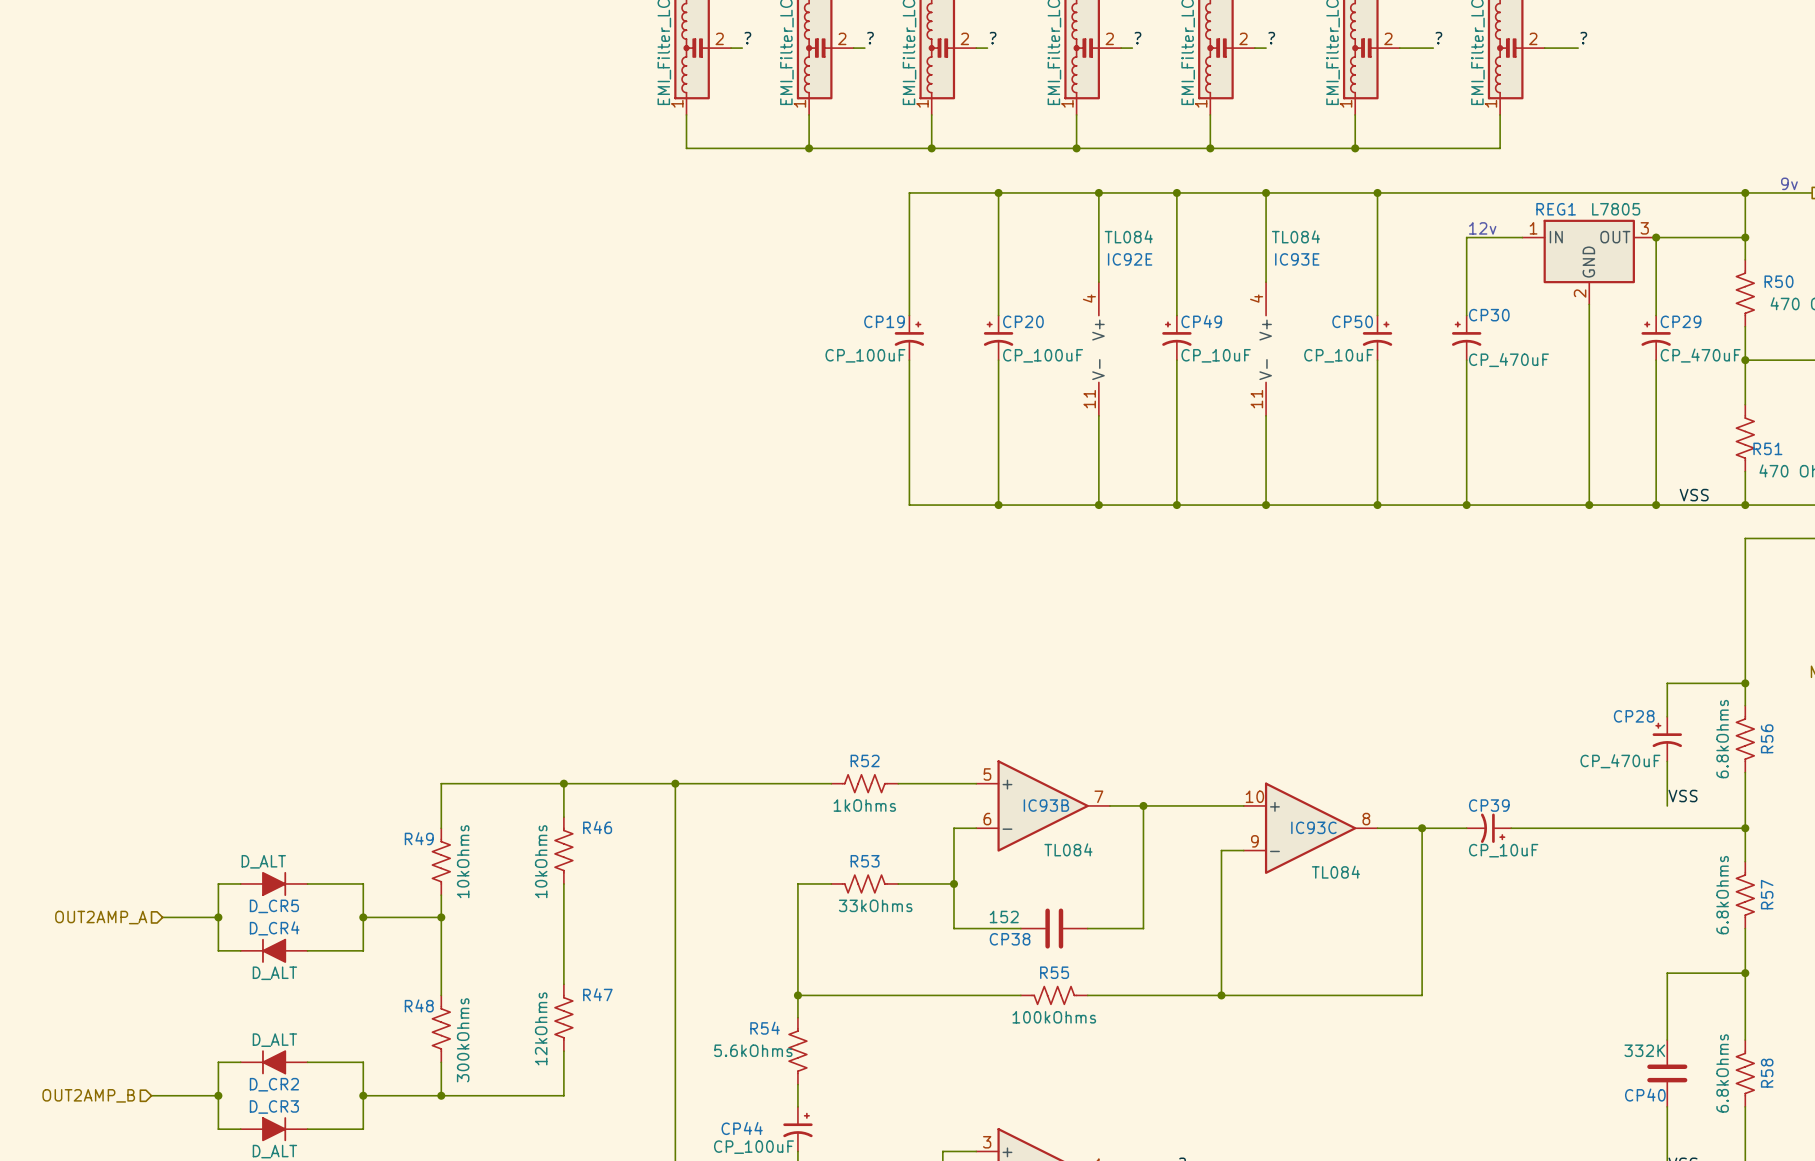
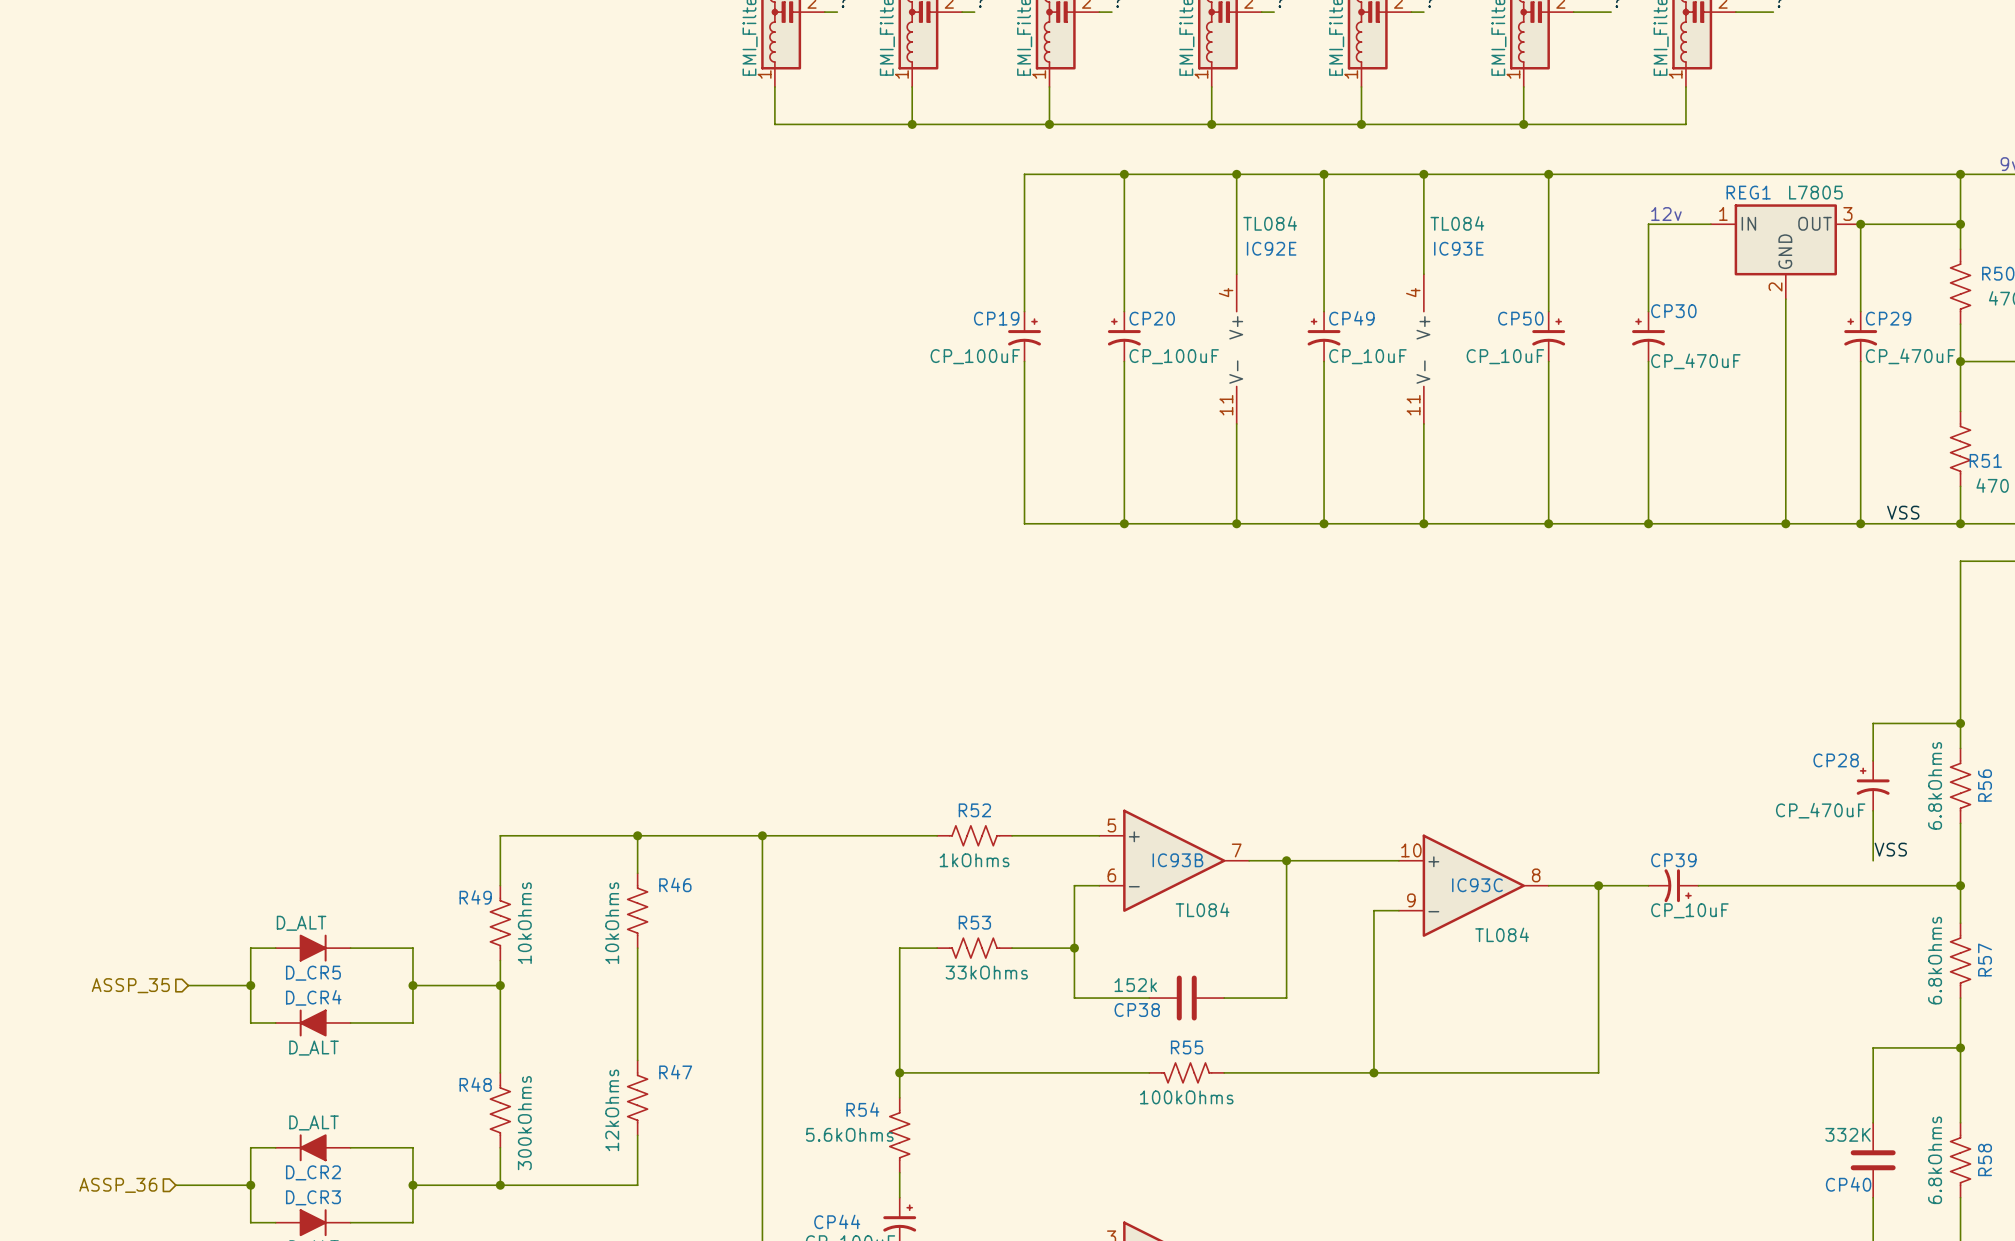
hierarchical label: OUT2AMP_A (101, 917) -> ASSP_35 (130, 985)
CP38 value: 152 (1004, 917) -> 152k (1135, 985)
hierarchical label: OUT2AMP_B (88, 1095) -> ASSP_36 (118, 1185)

